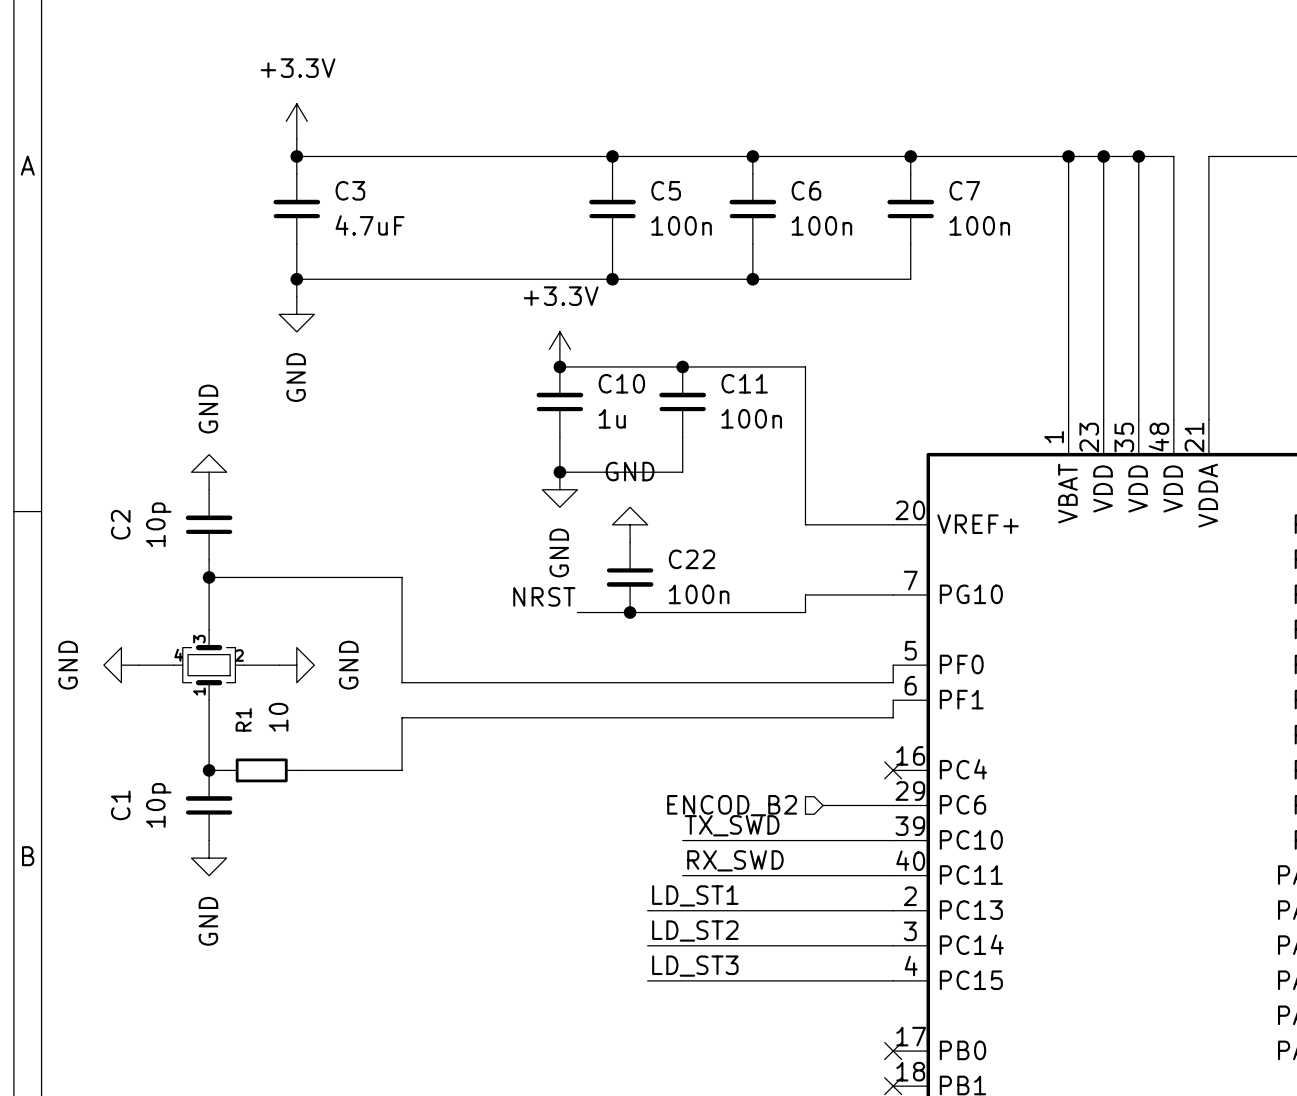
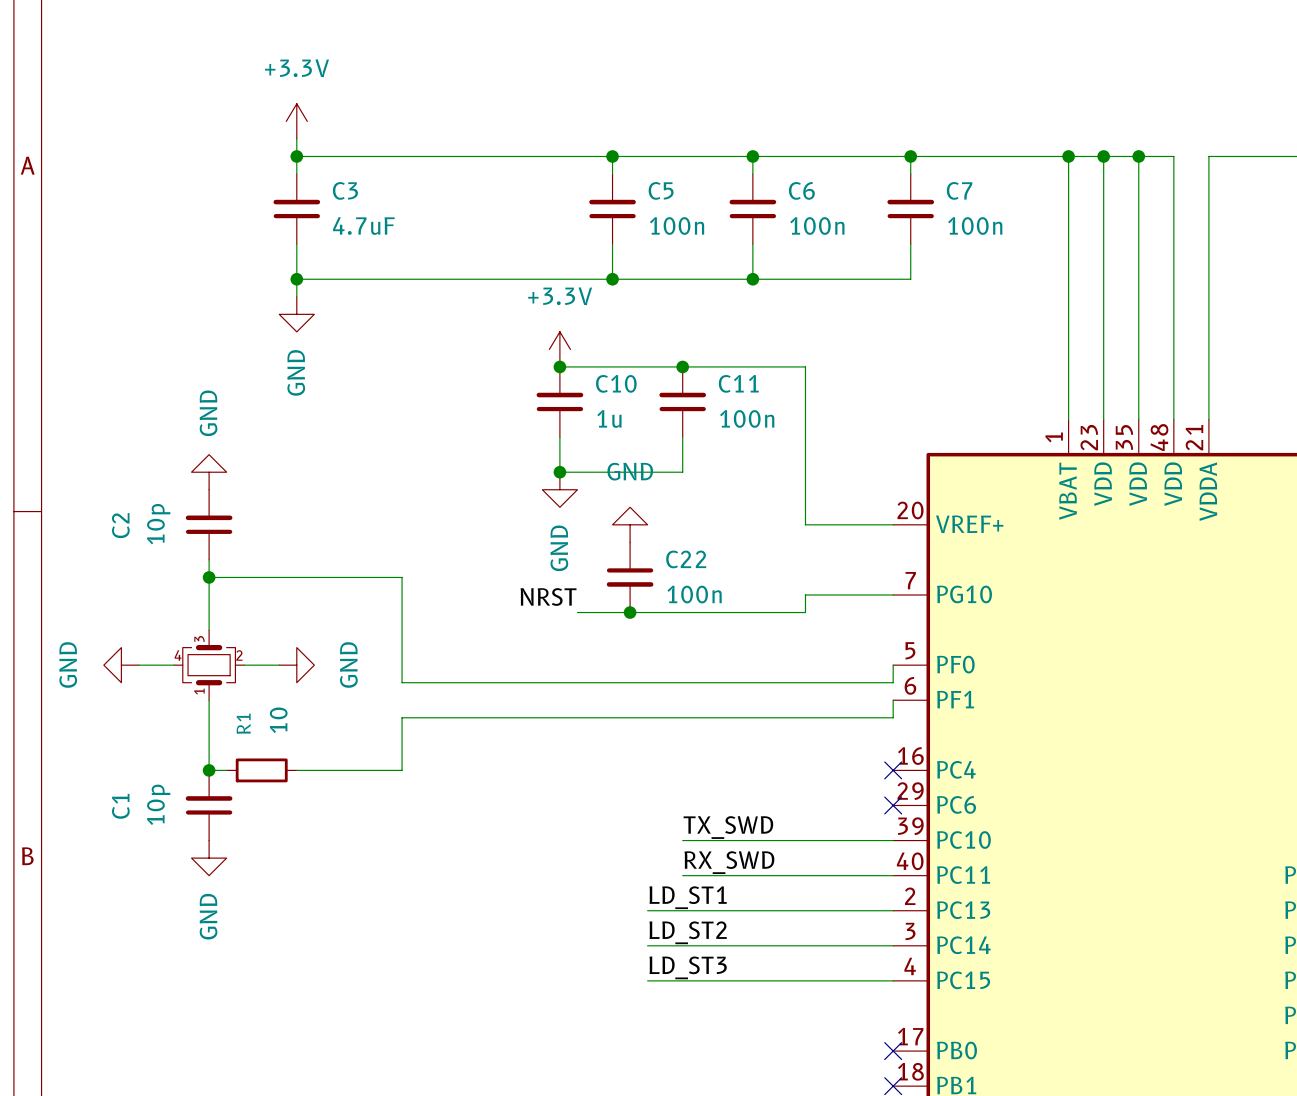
hierarchical label: ENCOD_B2 (732, 805) -> none
wire: (823, 805) (893, 805) -> none
no-connect mark: none -> (893, 805)

